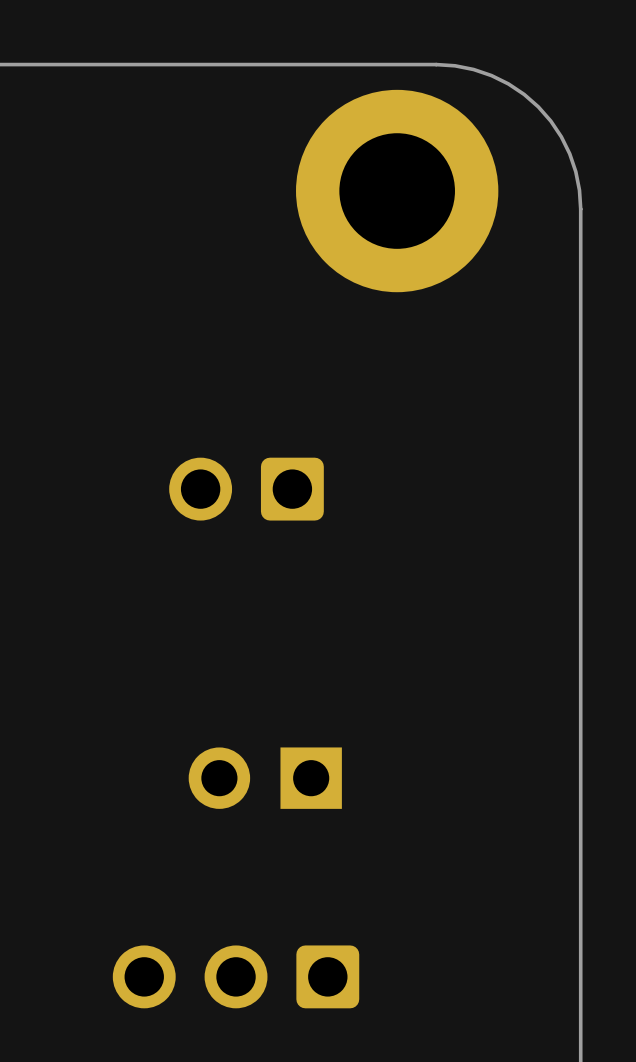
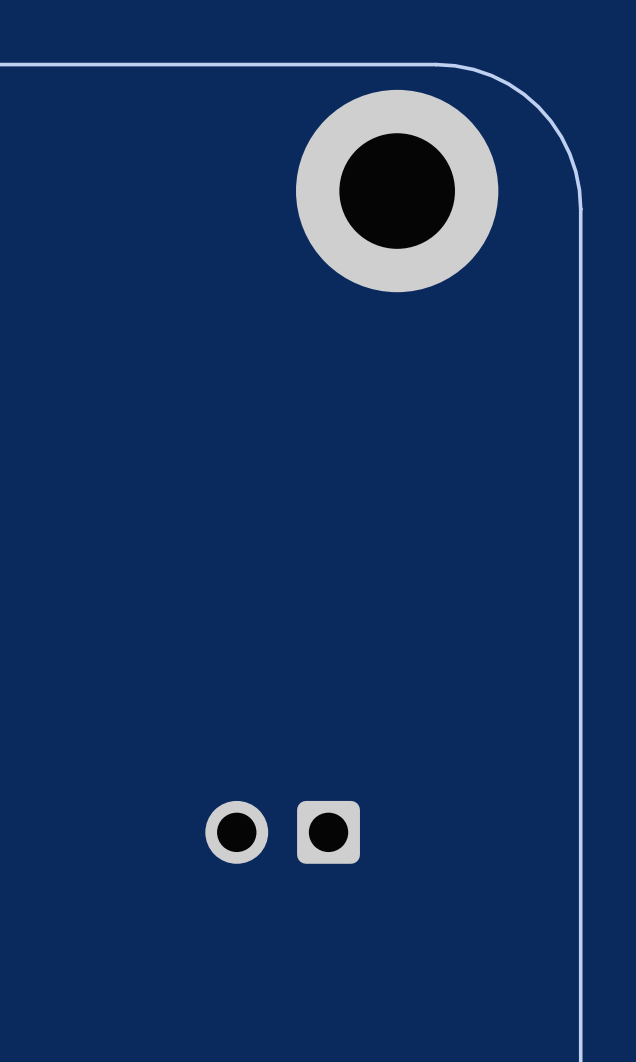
part position: (246, 489) -> (282, 832)
part: (265, 778) -> none
part: (236, 976) -> none

